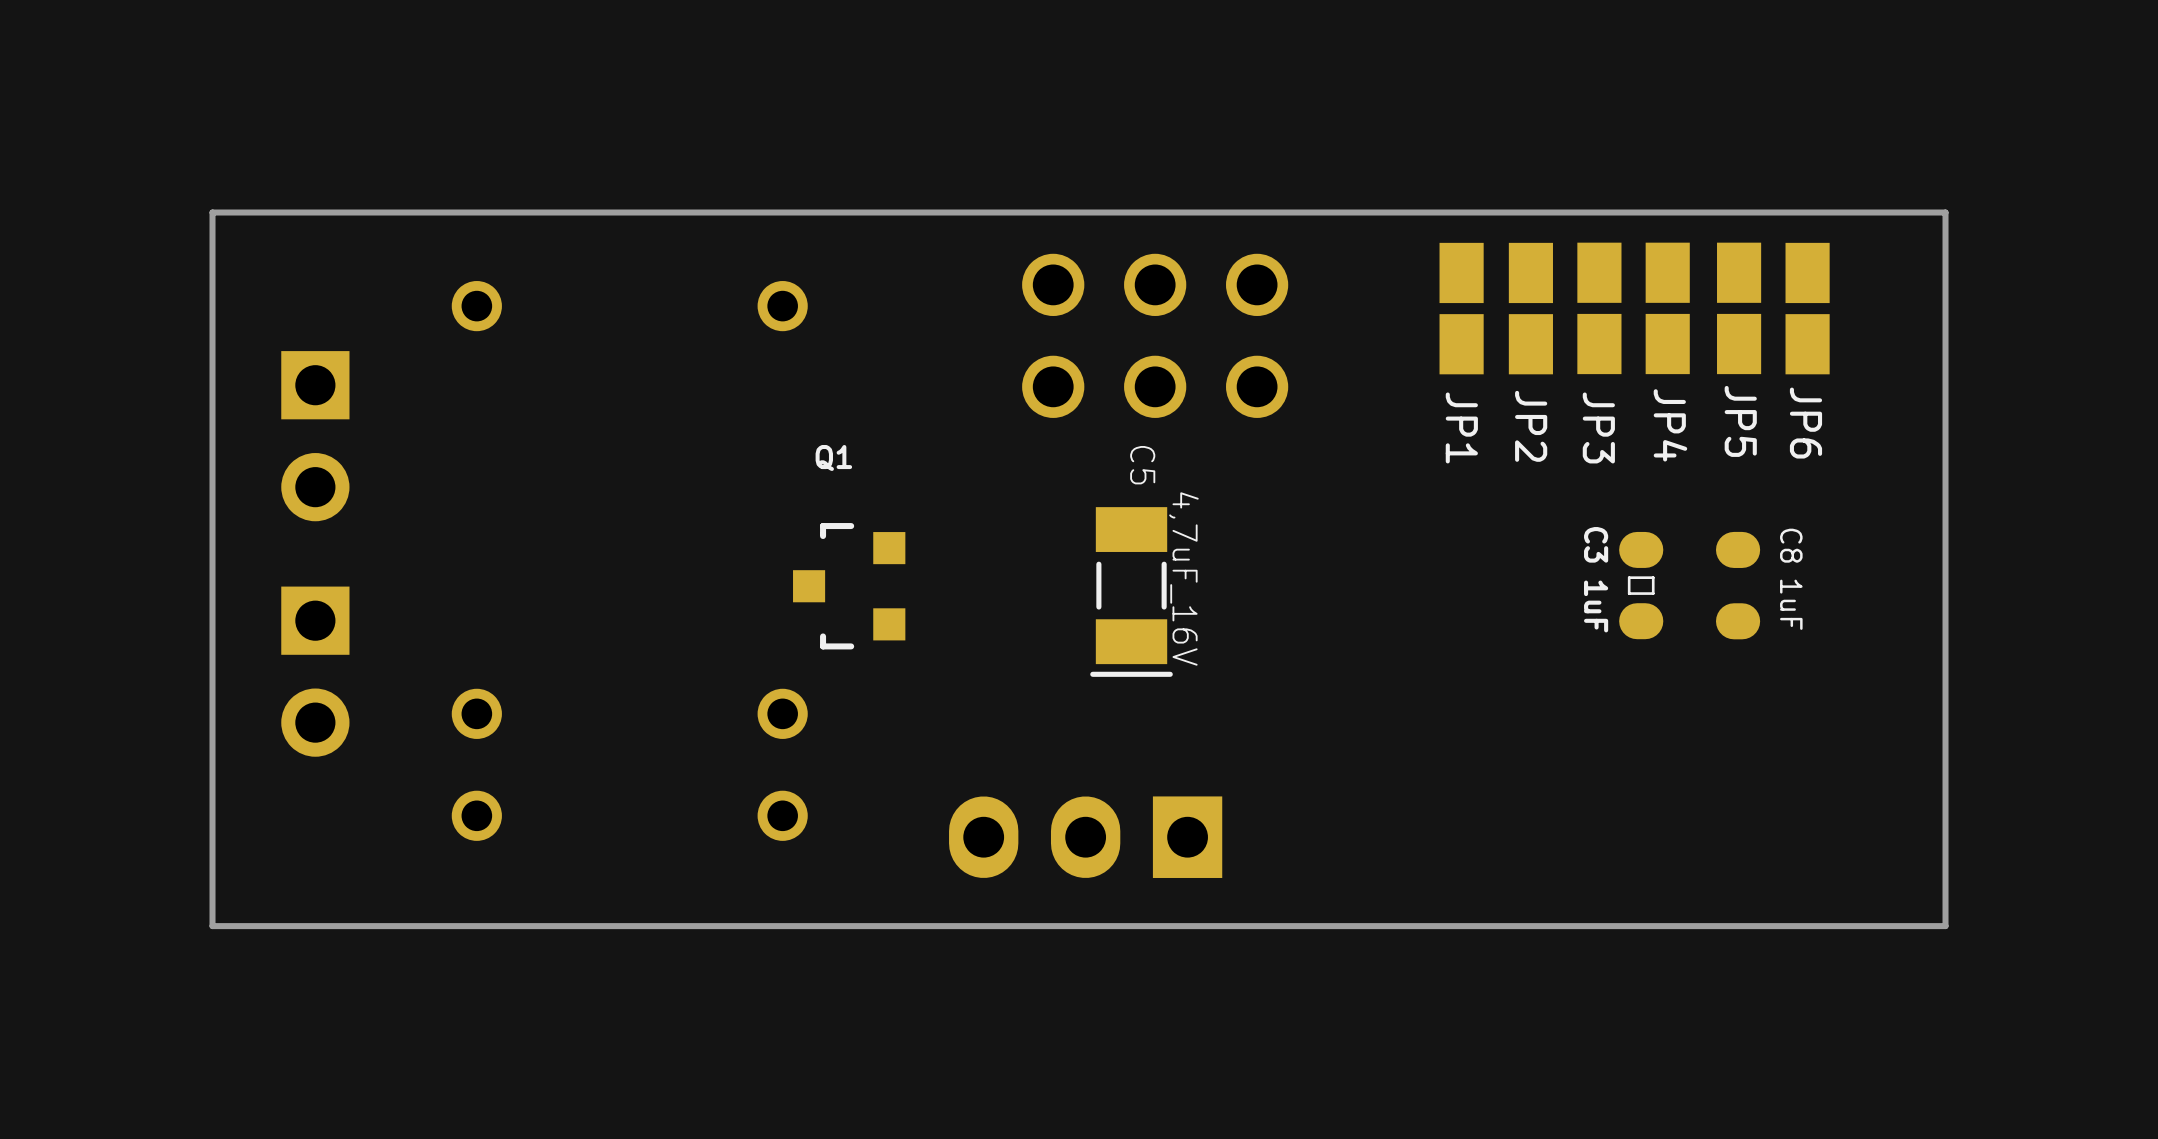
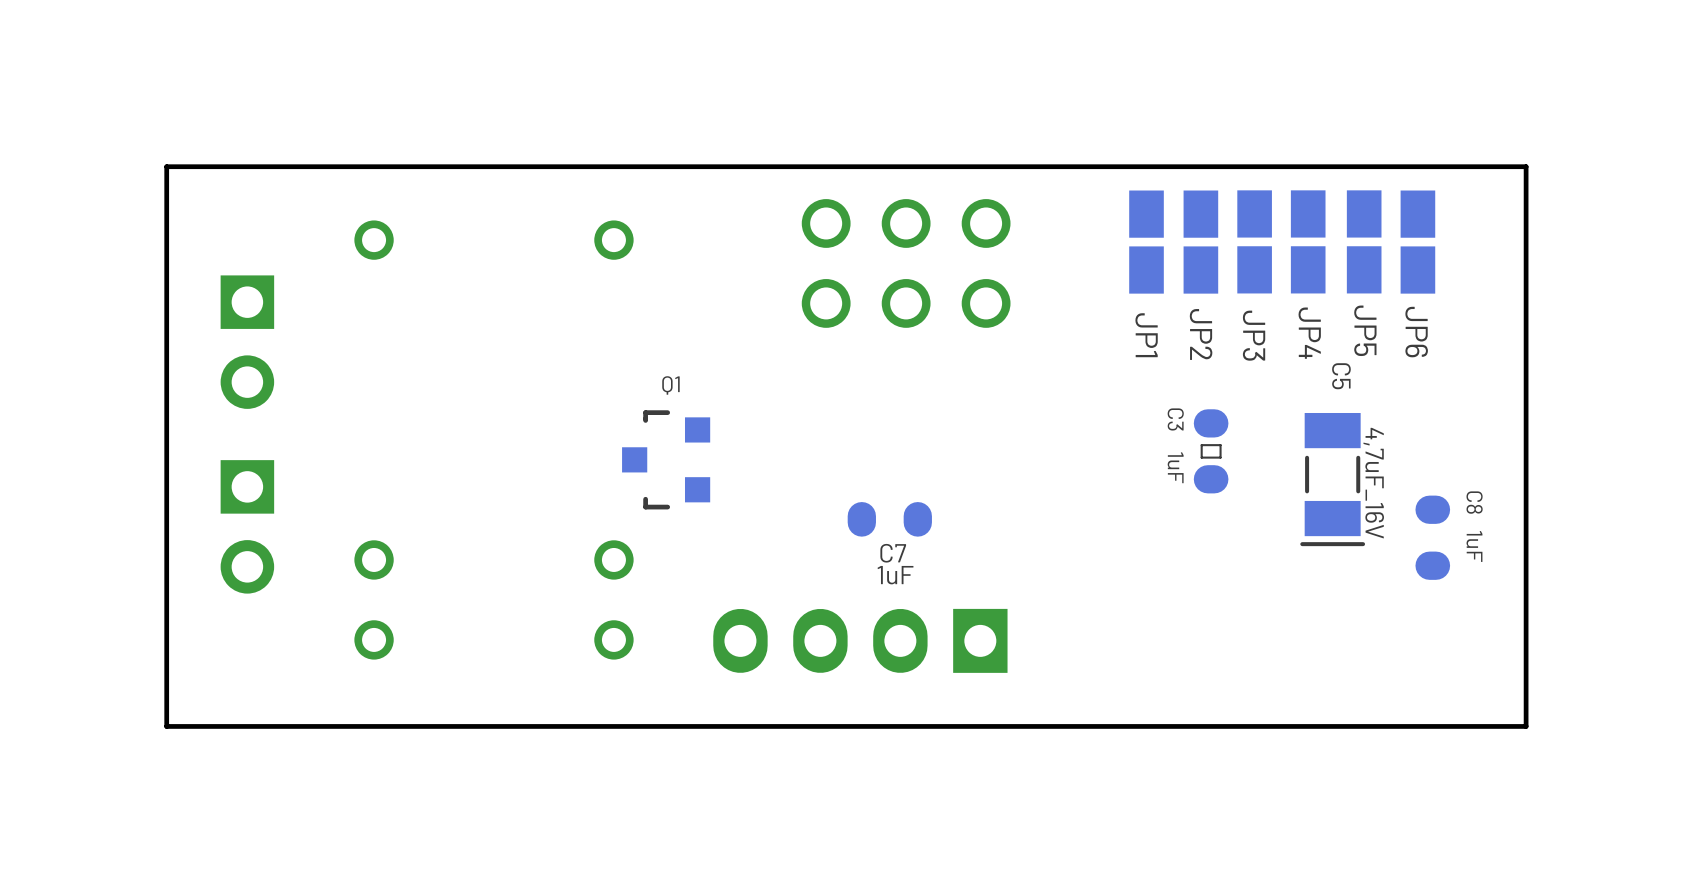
Q1 name position: Q1 (833, 457) -> Q1 (670, 385)
C3 position: (1641, 585) -> (1211, 451)
C8 position: (1738, 585) -> (1432, 537)
C5 position: (1131, 591) -> (1332, 479)
C7: none -> 1uF (889, 519)
part footprint: [949, 796, 1223, 878] -> [713, 608, 1008, 673]

